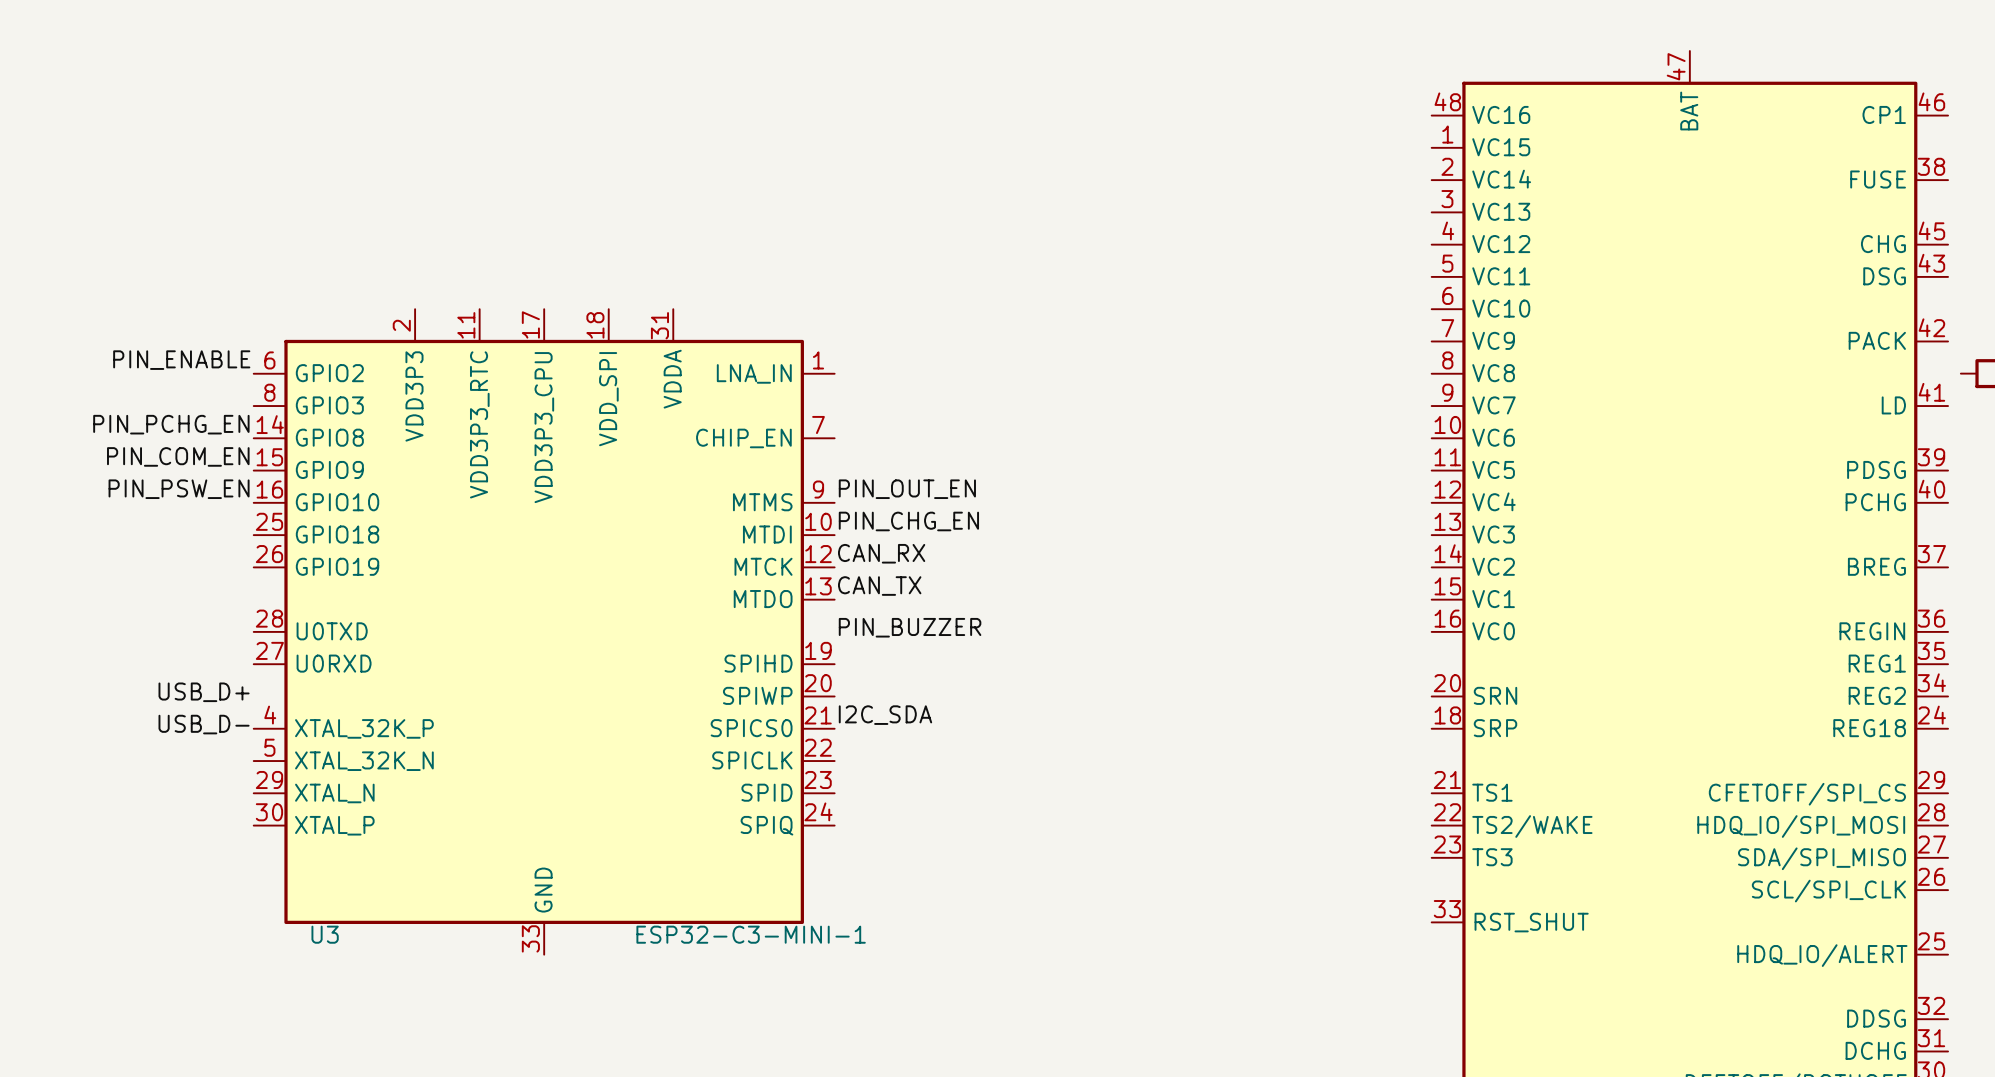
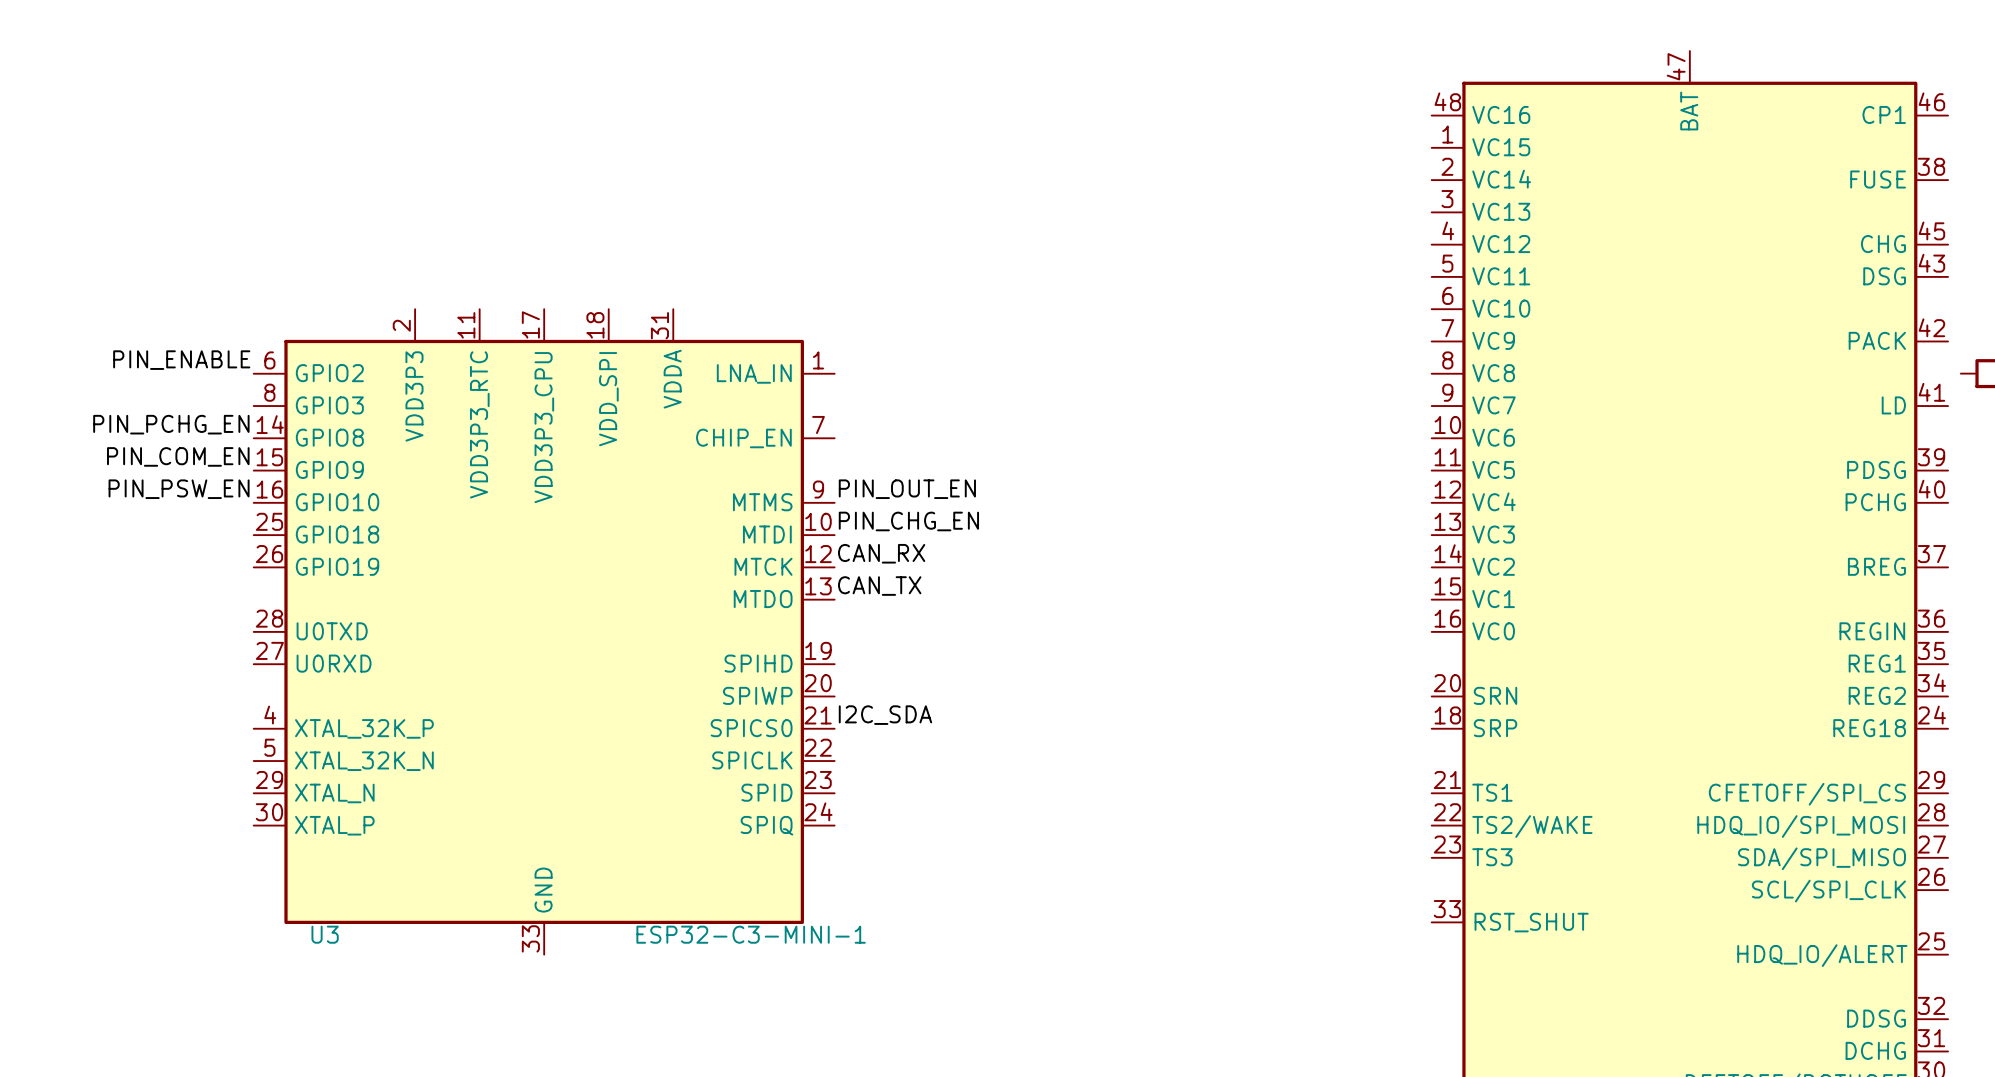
label: PIN_BUZZER (910, 627) -> none
label: USB_D+ (204, 692) -> none
label: USB_D- (204, 724) -> none

